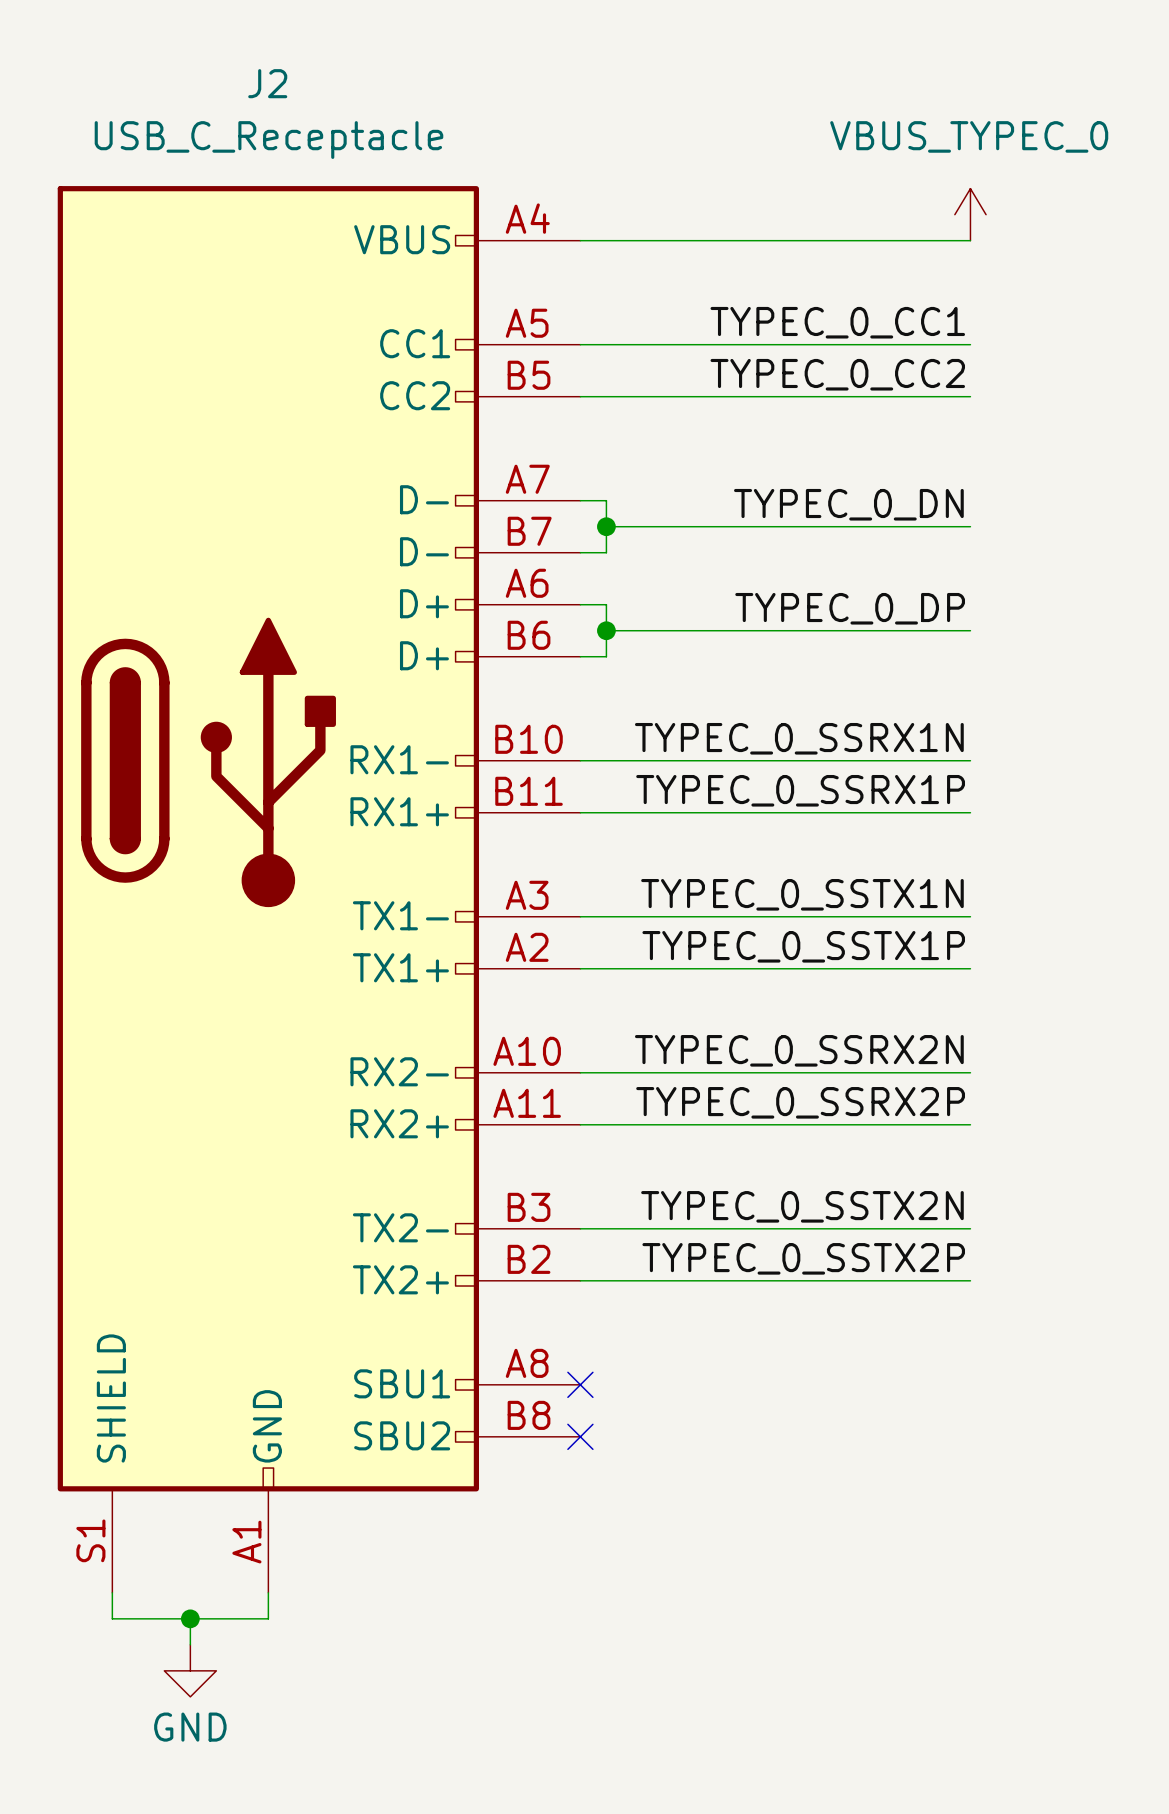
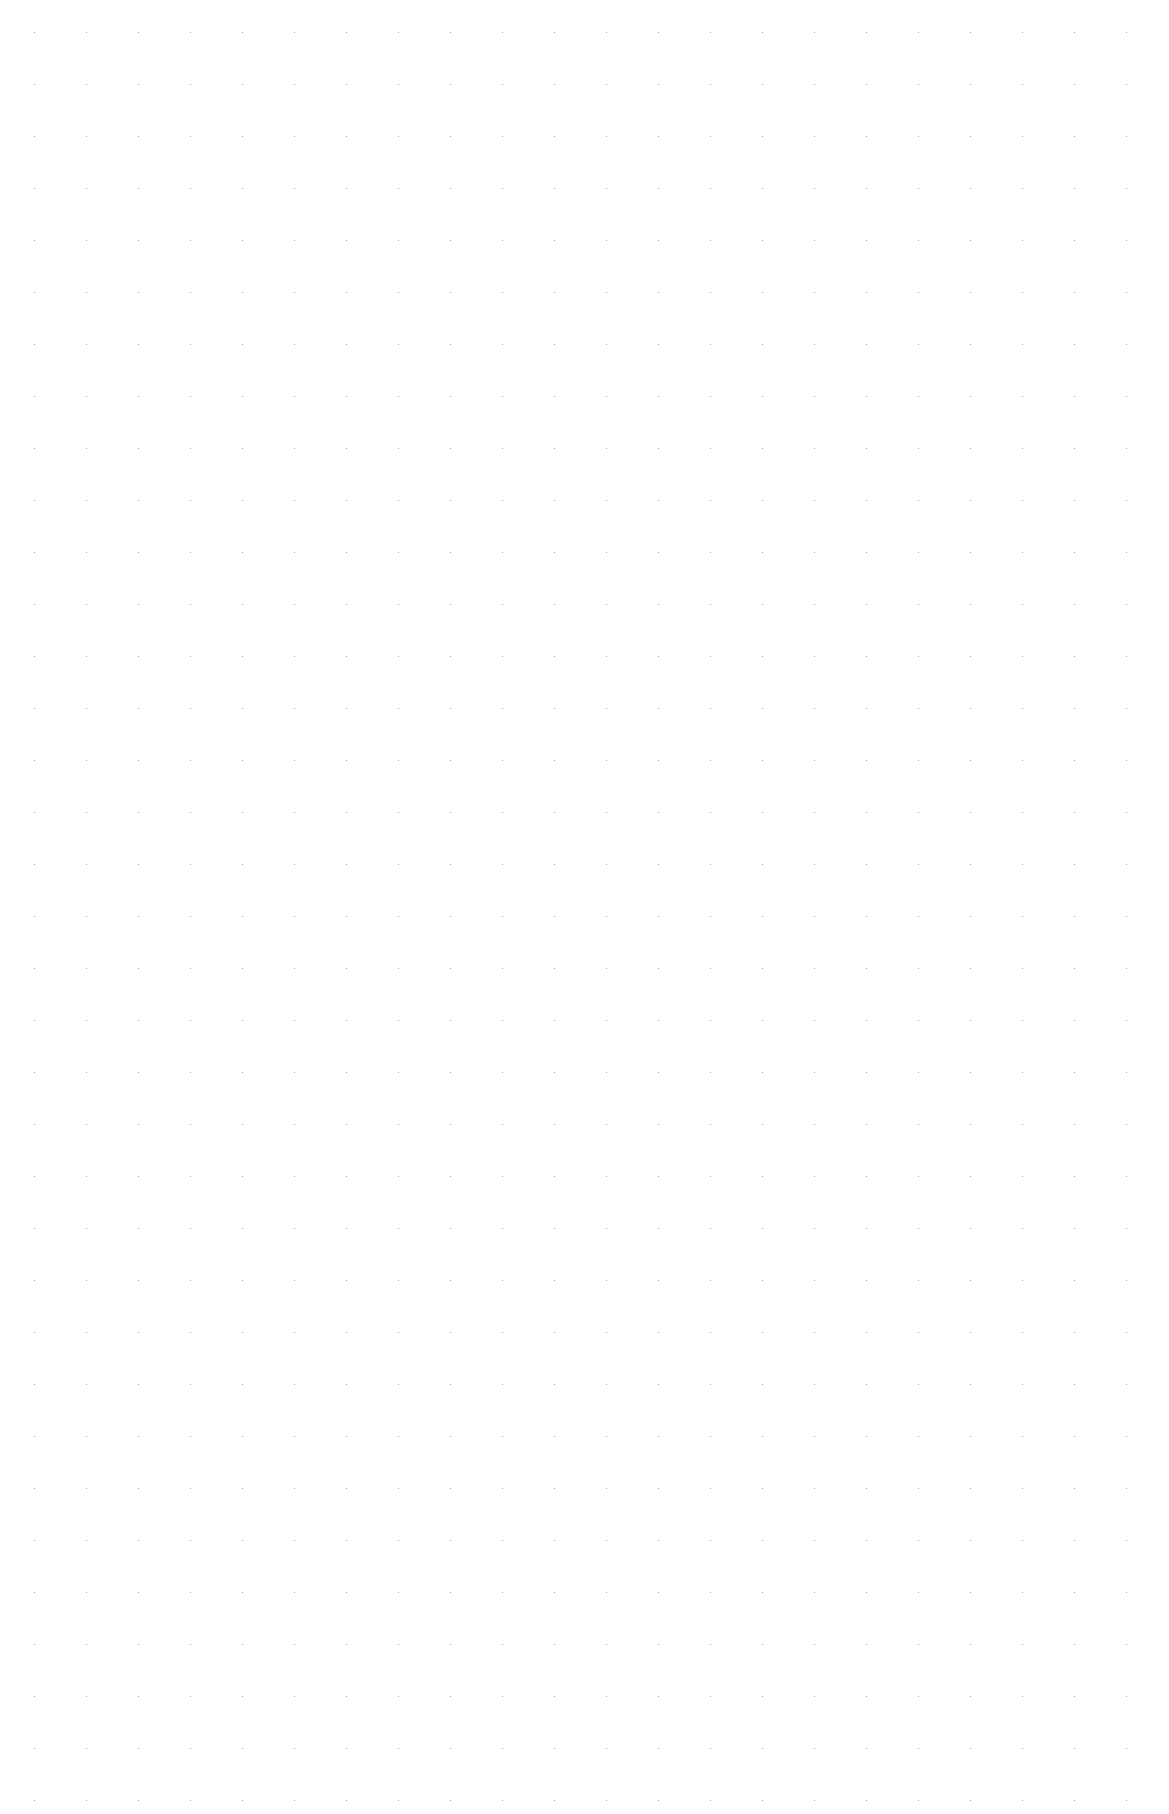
power symbol: VBUS_TYPEC_0 (970, 214) -> none
wire: (580, 240) (970, 240) -> none
label: TYPEC_0_CC1 (837, 322) -> none
wire: (580, 344) (970, 344) -> none
label: TYPEC_0_CC2 (837, 374) -> none
wire: (580, 396) (970, 396) -> none
wire: (580, 500) (606, 500) (606, 552) (580, 552) -> none
label: TYPEC_0_DN (848, 504) -> none
wire: (606, 526) (970, 526) -> none
junction: (606, 526) -> none
wire: (580, 604) (606, 604) (606, 656) (580, 656) -> none
label: TYPEC_0_DP (850, 608) -> none
wire: (606, 630) (970, 630) -> none
junction: (606, 630) -> none
label: TYPEC_0_SSRX1N (799, 738) -> none
wire: (580, 760) (970, 760) -> none
label: TYPEC_0_SSRX1P (800, 790) -> none
wire: (580, 812) (970, 812) -> none
J2: USB_C_Receptacle (319, 889) -> none
label: TYPEC_0_SSTX1N (802, 894) -> none
wire: (580, 916) (970, 916) -> none
label: TYPEC_0_SSTX1P (803, 946) -> none
wire: (580, 968) (970, 968) -> none
label: TYPEC_0_SSRX2N (799, 1050) -> none
wire: (580, 1072) (970, 1072) -> none
label: TYPEC_0_SSRX2P (800, 1102) -> none
wire: (580, 1124) (970, 1124) -> none
label: TYPEC_0_SSTX2N (802, 1206) -> none
wire: (580, 1228) (970, 1228) -> none
label: TYPEC_0_SSTX2P (803, 1258) -> none
wire: (580, 1280) (970, 1280) -> none
no-connect mark: (580, 1384) -> none
no-connect mark: (580, 1436) -> none
wire: (112, 1592) (112, 1618) (268, 1618) (268, 1592) -> none
wire: (190, 1618) (190, 1644) -> none
junction: (190, 1618) -> none
power symbol: GND (190, 1670) -> none

